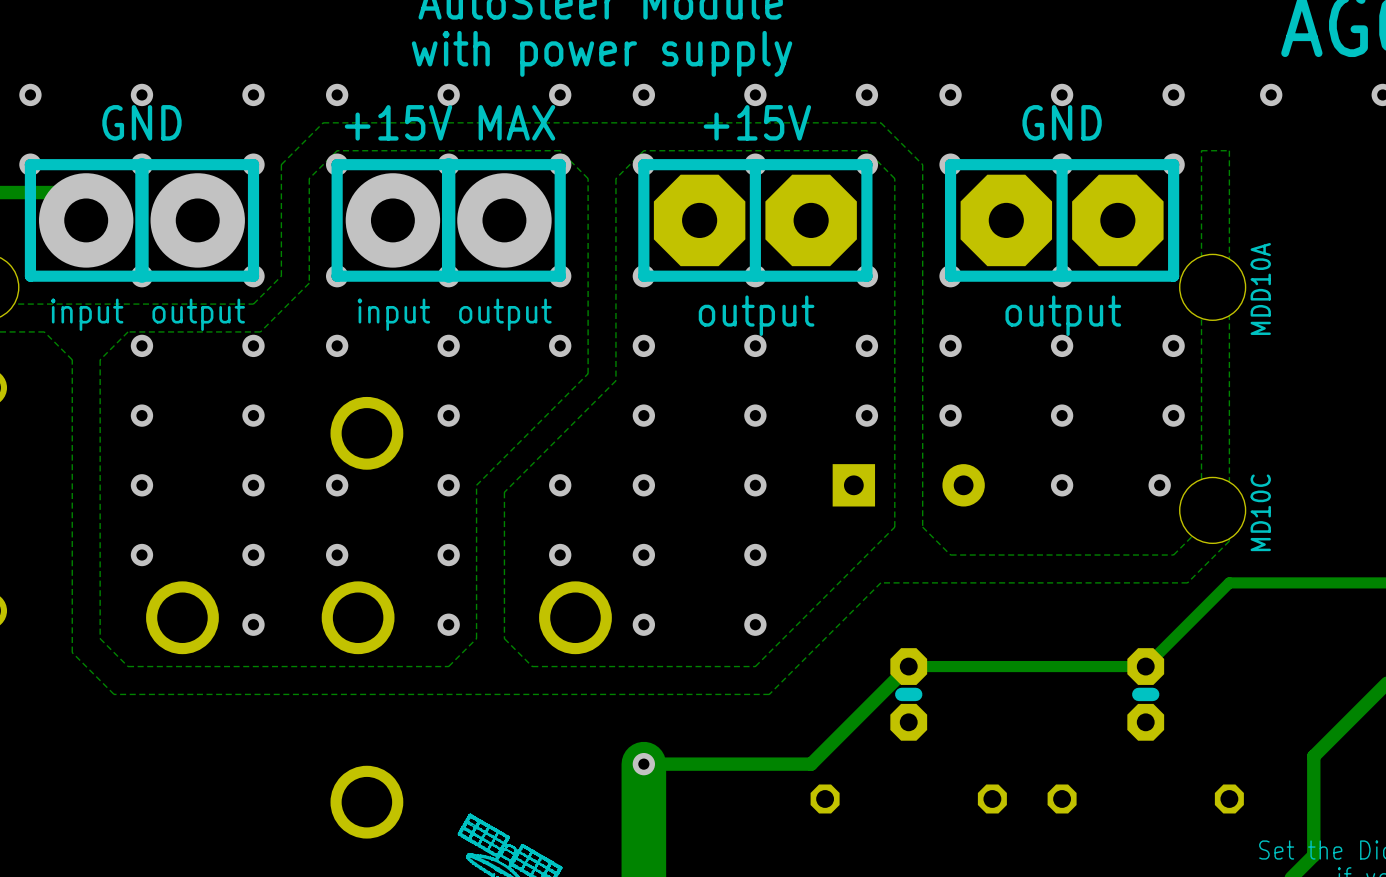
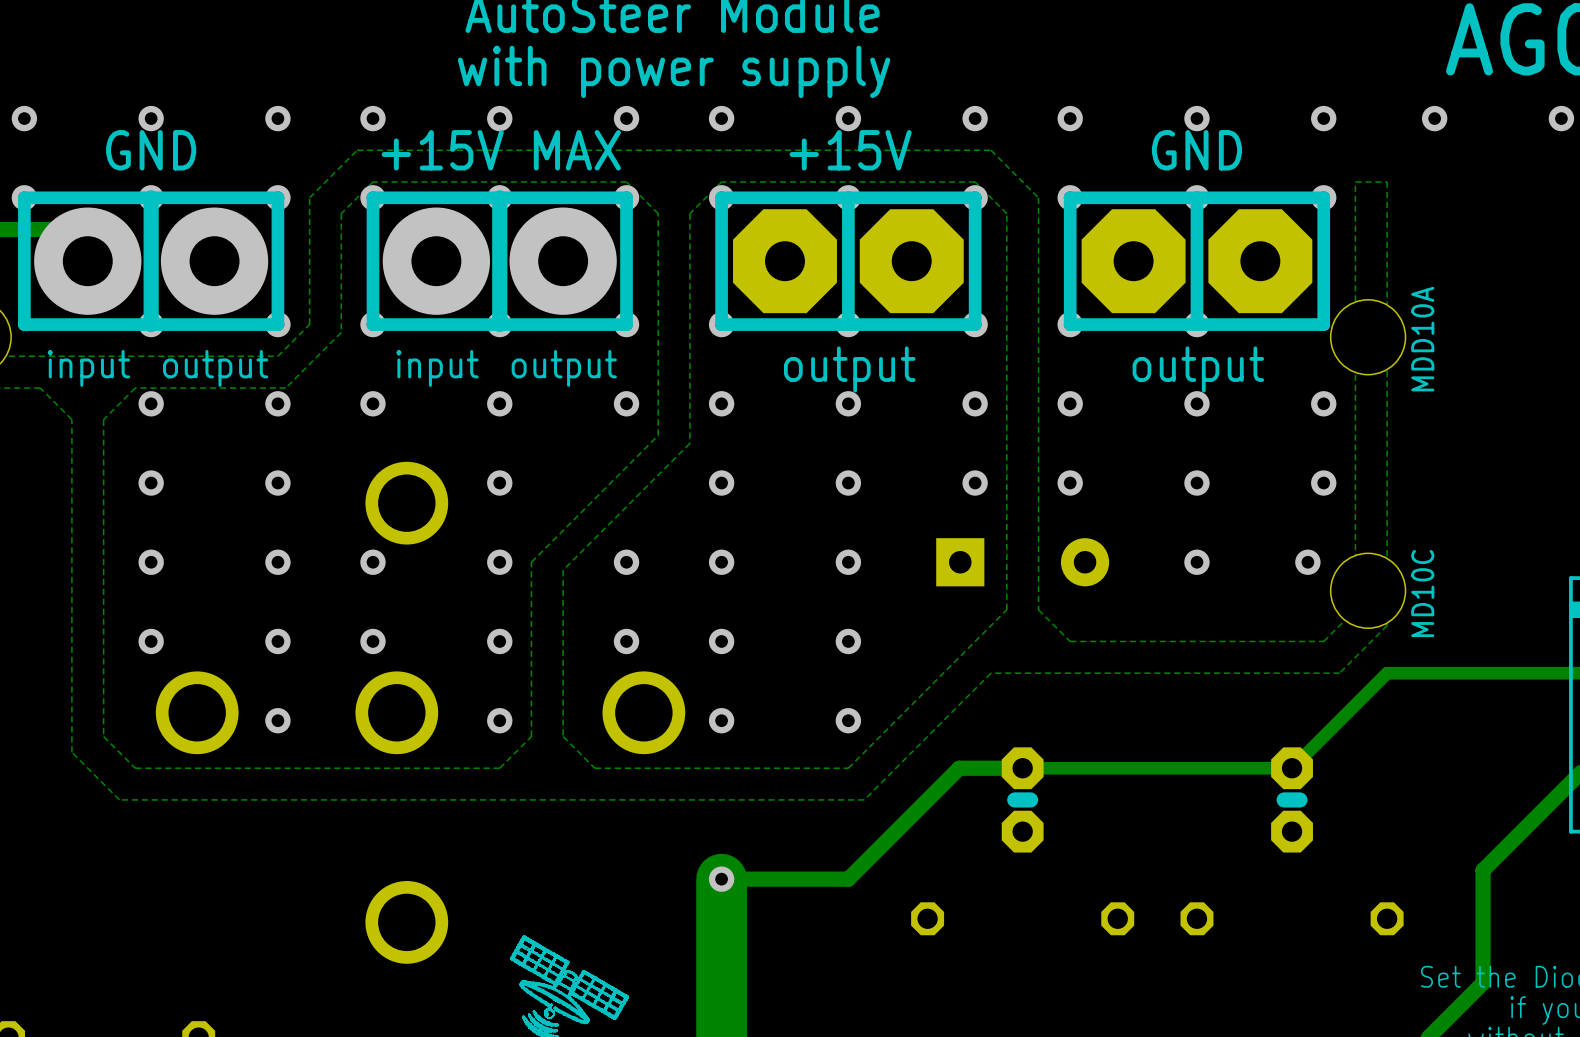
track: (908, 666) (811, 764) (755, 764) -> (1022, 768) (959, 768) (848, 879)

